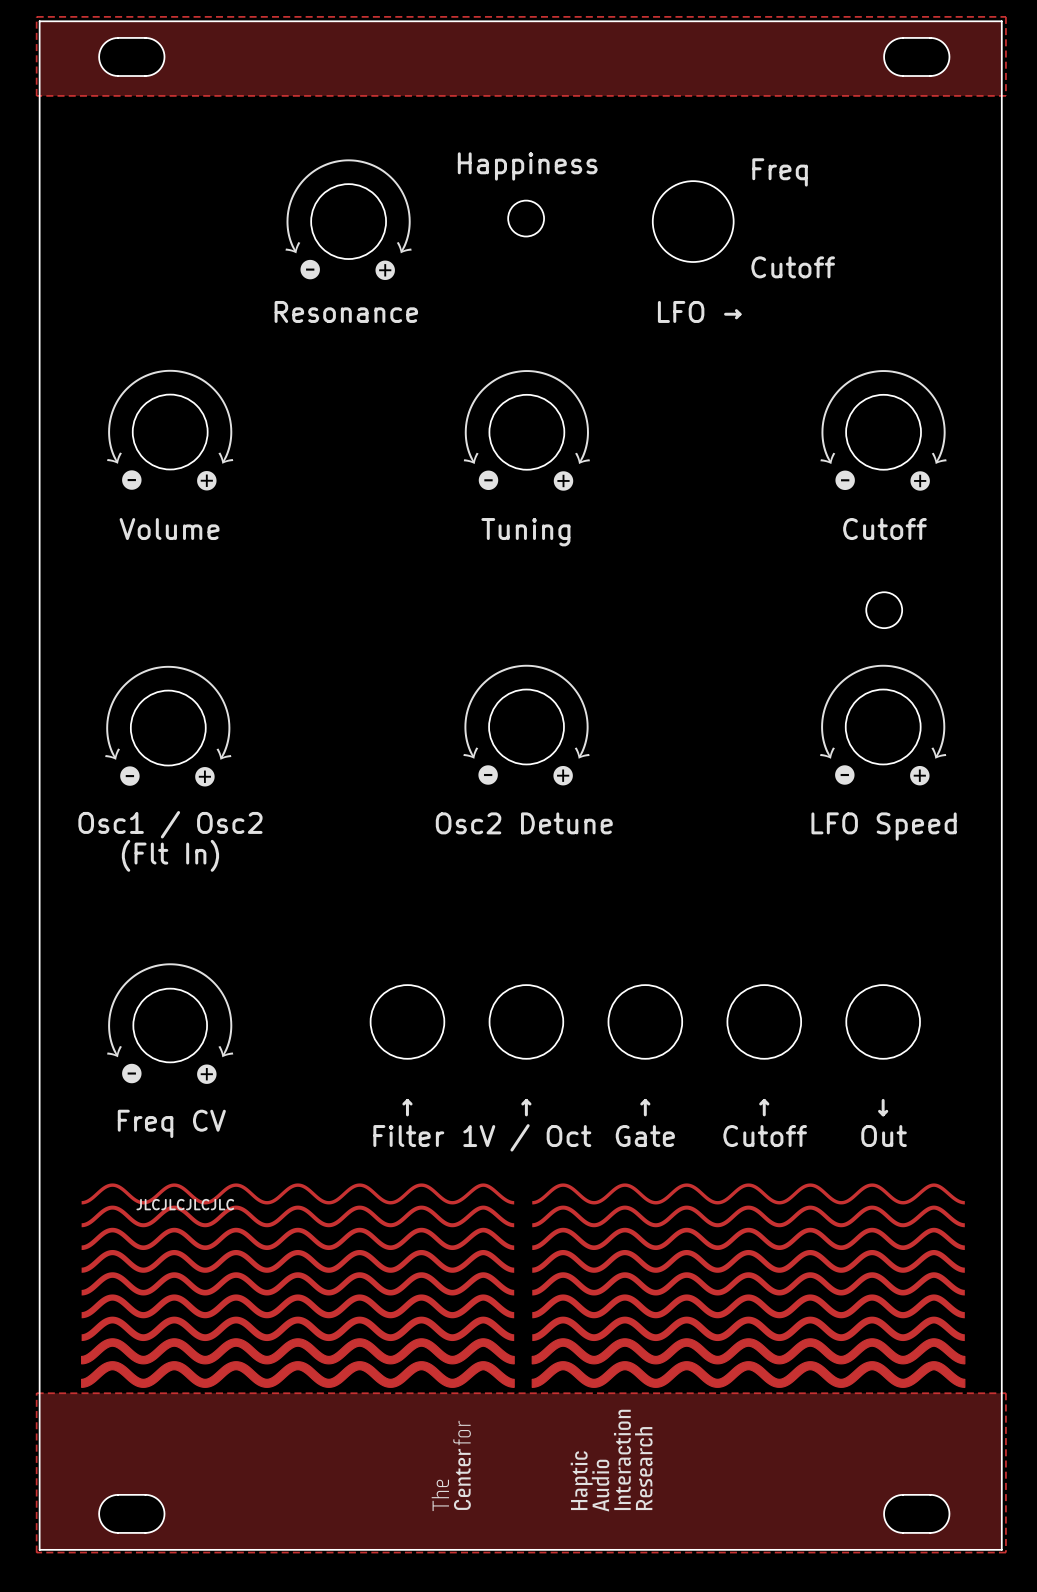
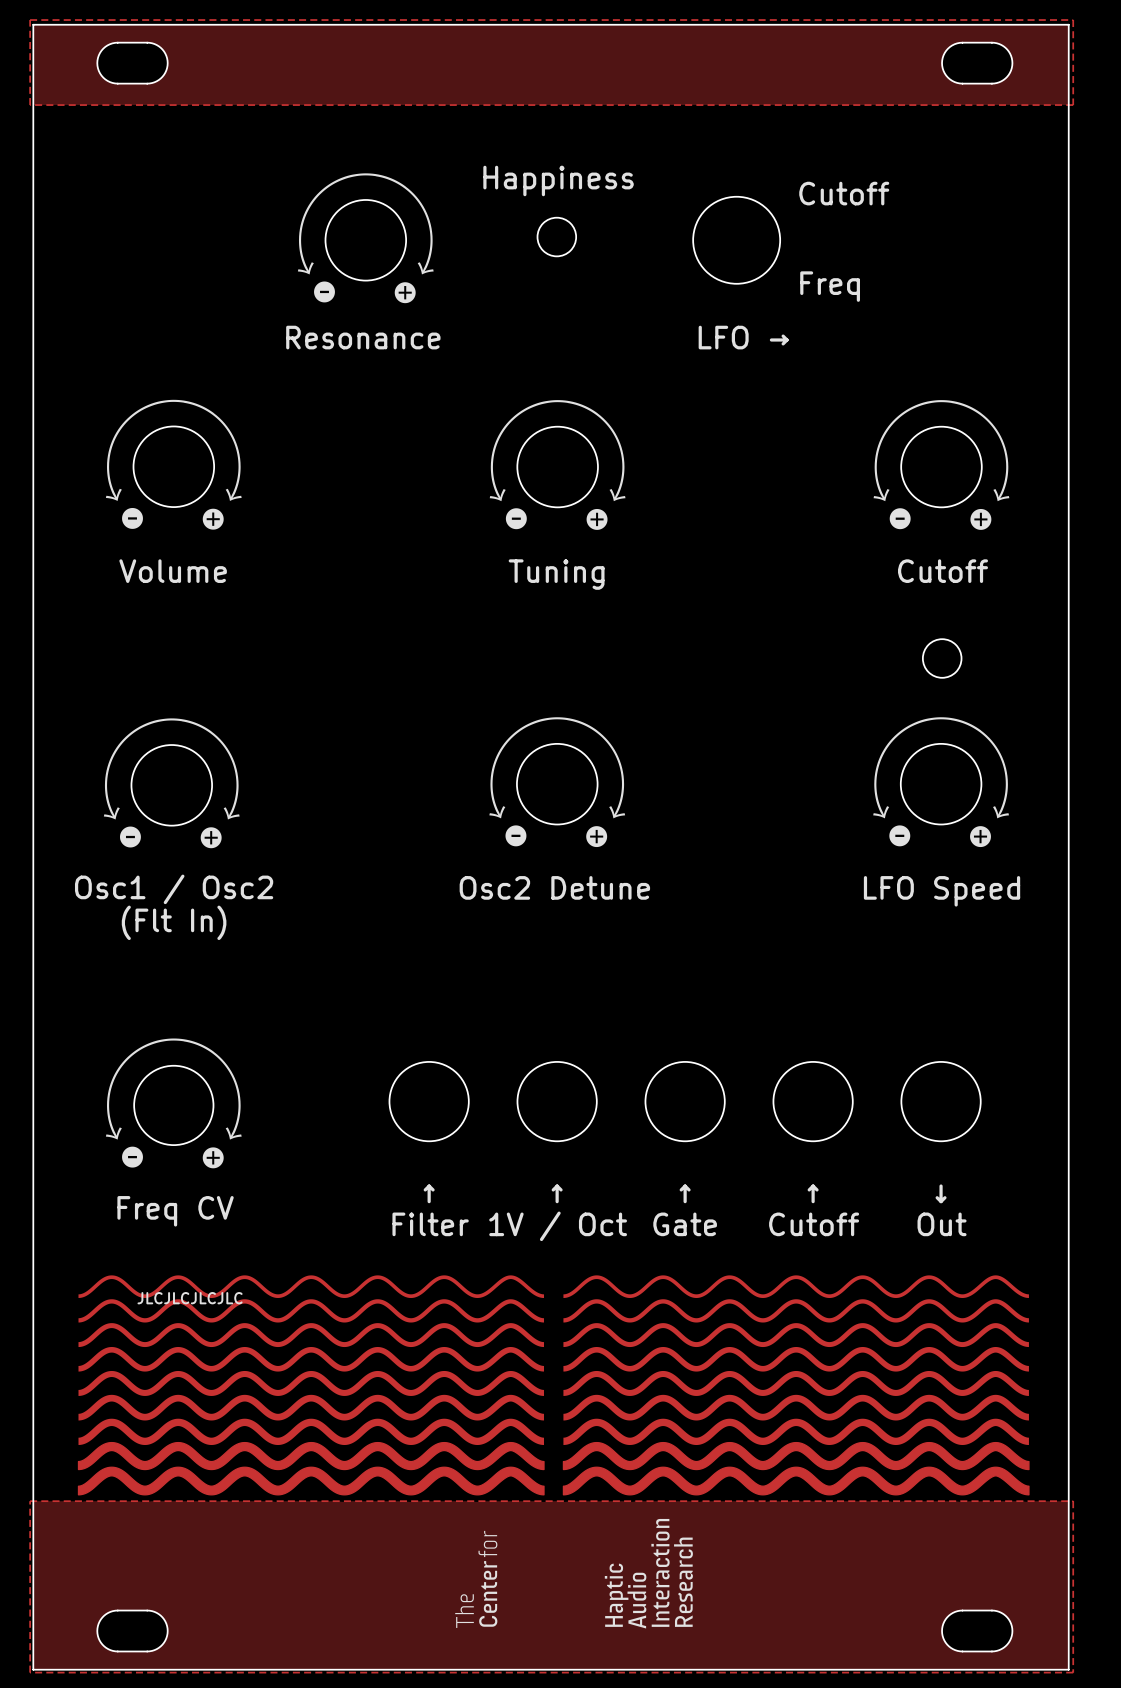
text position: Freq (780, 172) -> Freq (830, 286)
text position: Cutoff (793, 267) -> Cutoff (844, 193)

